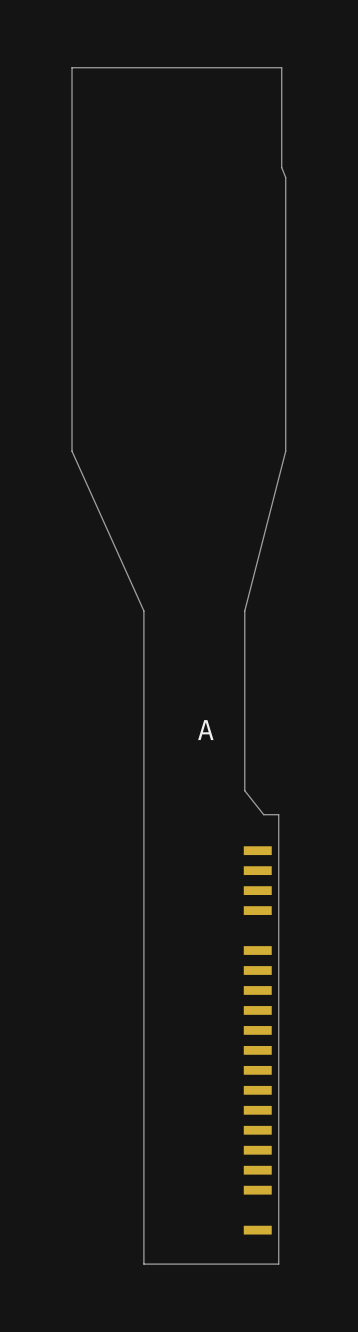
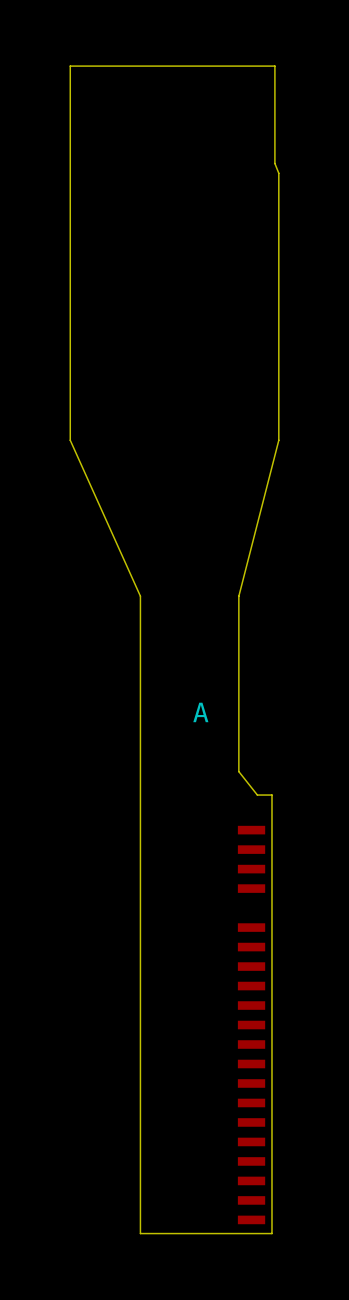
part footprint: [243, 846, 272, 1235] -> [237, 825, 266, 1225]

